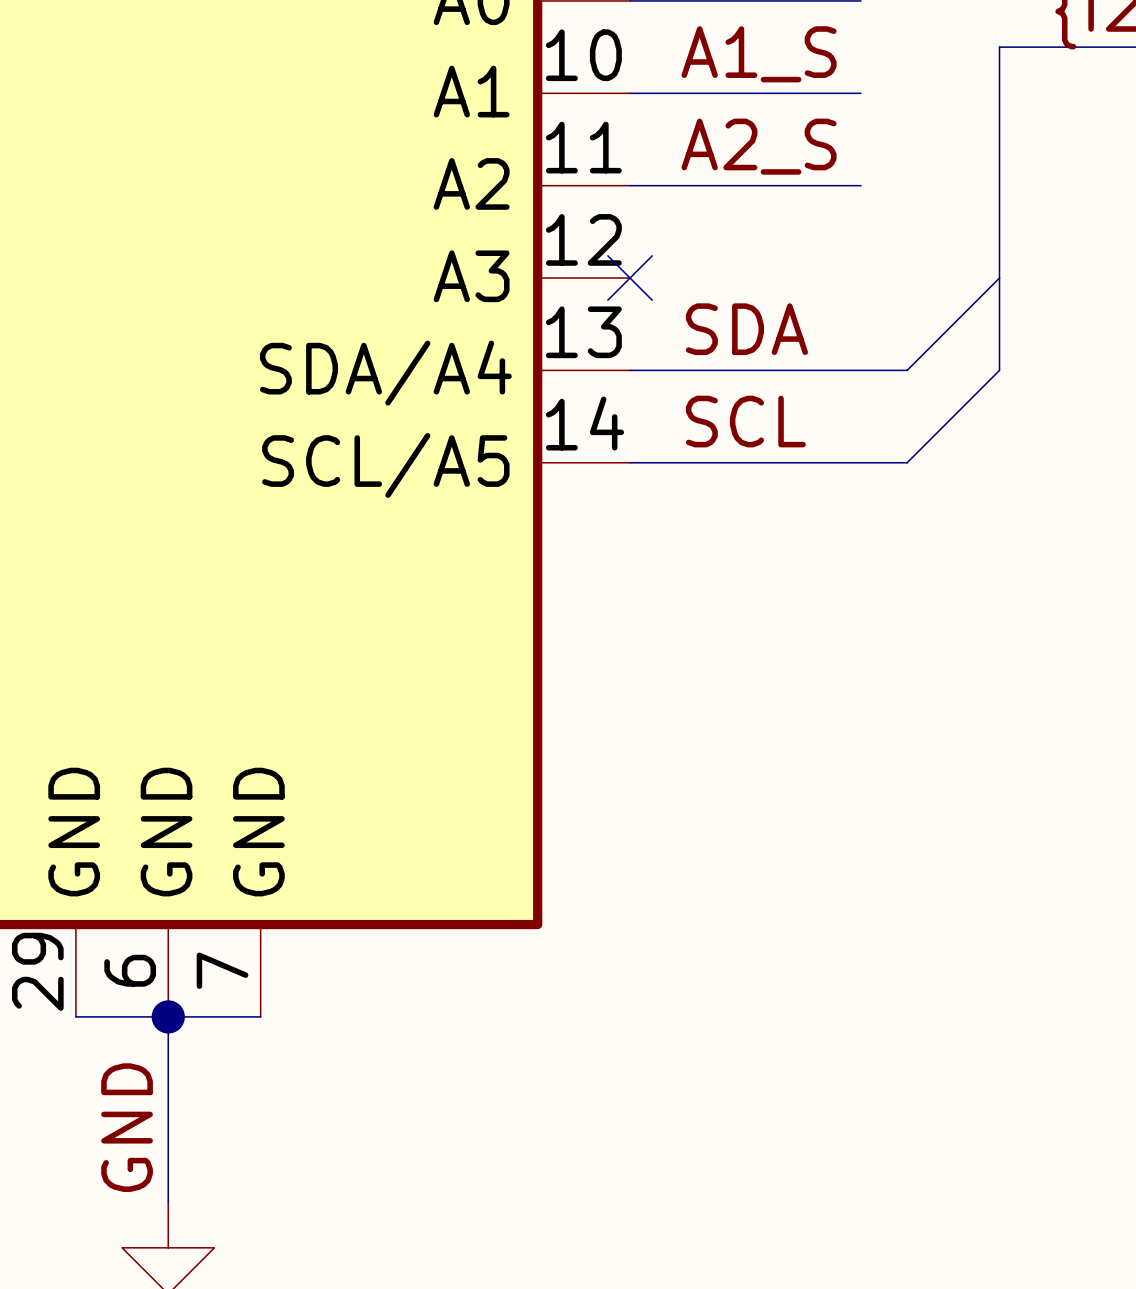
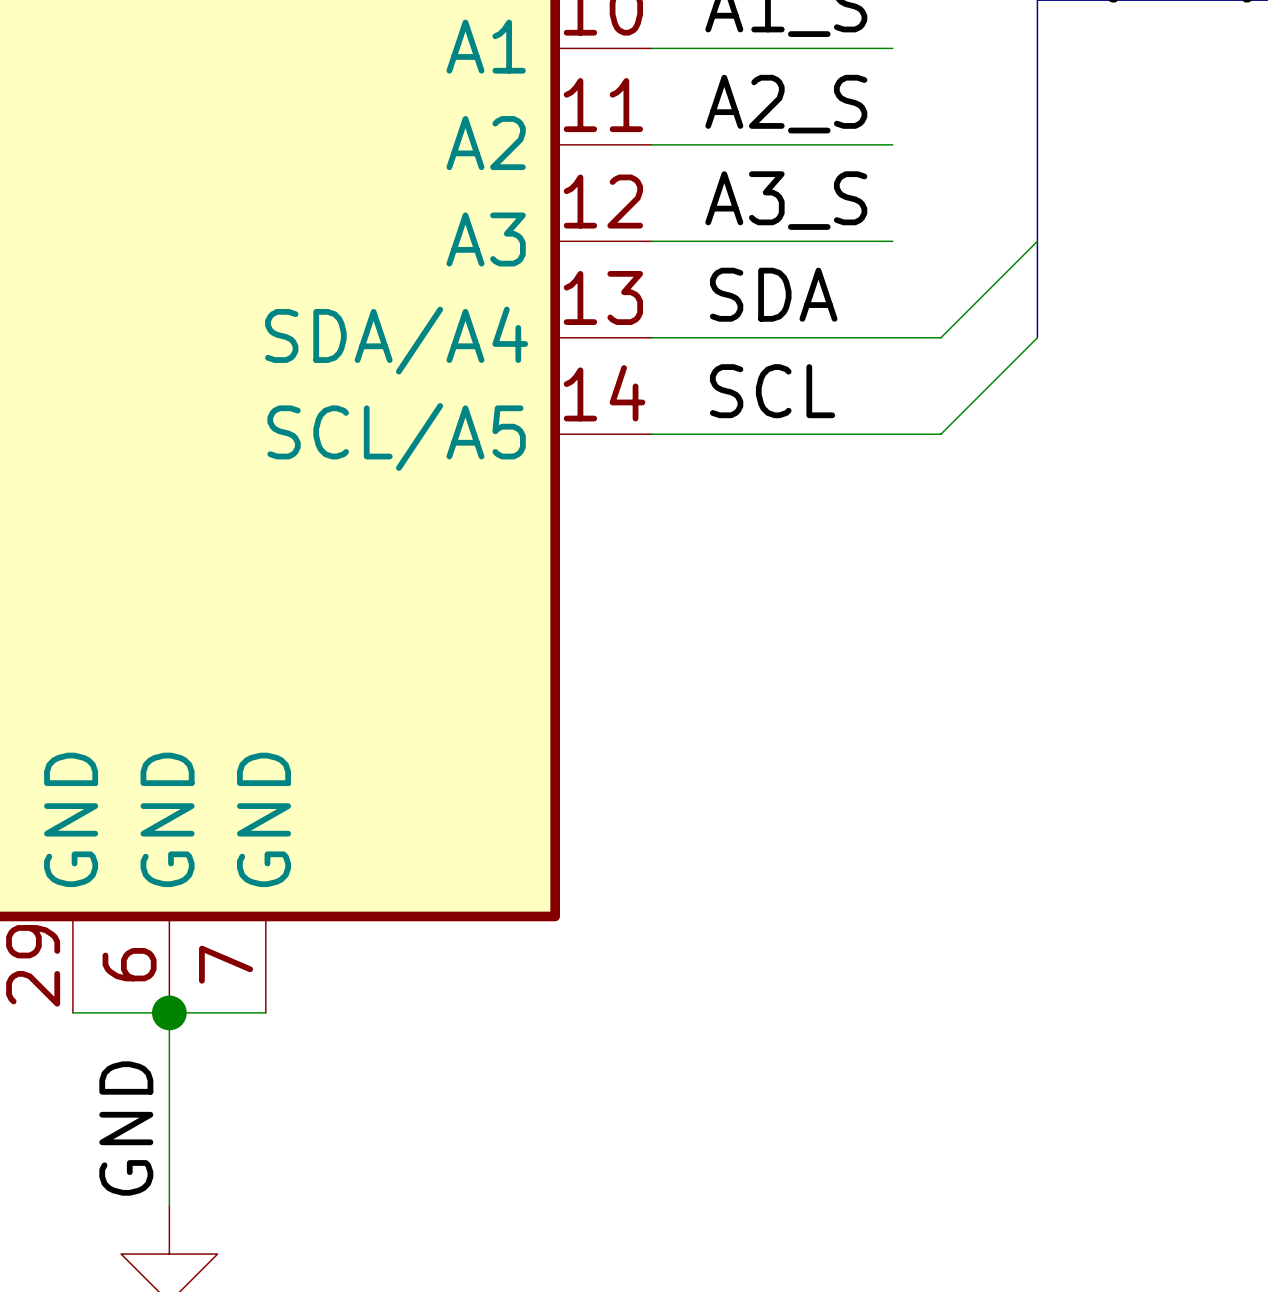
label: none -> A3_S (786, 200)
wire: none -> (651, 241) (892, 241)
no-connect mark: (630, 278) -> none

